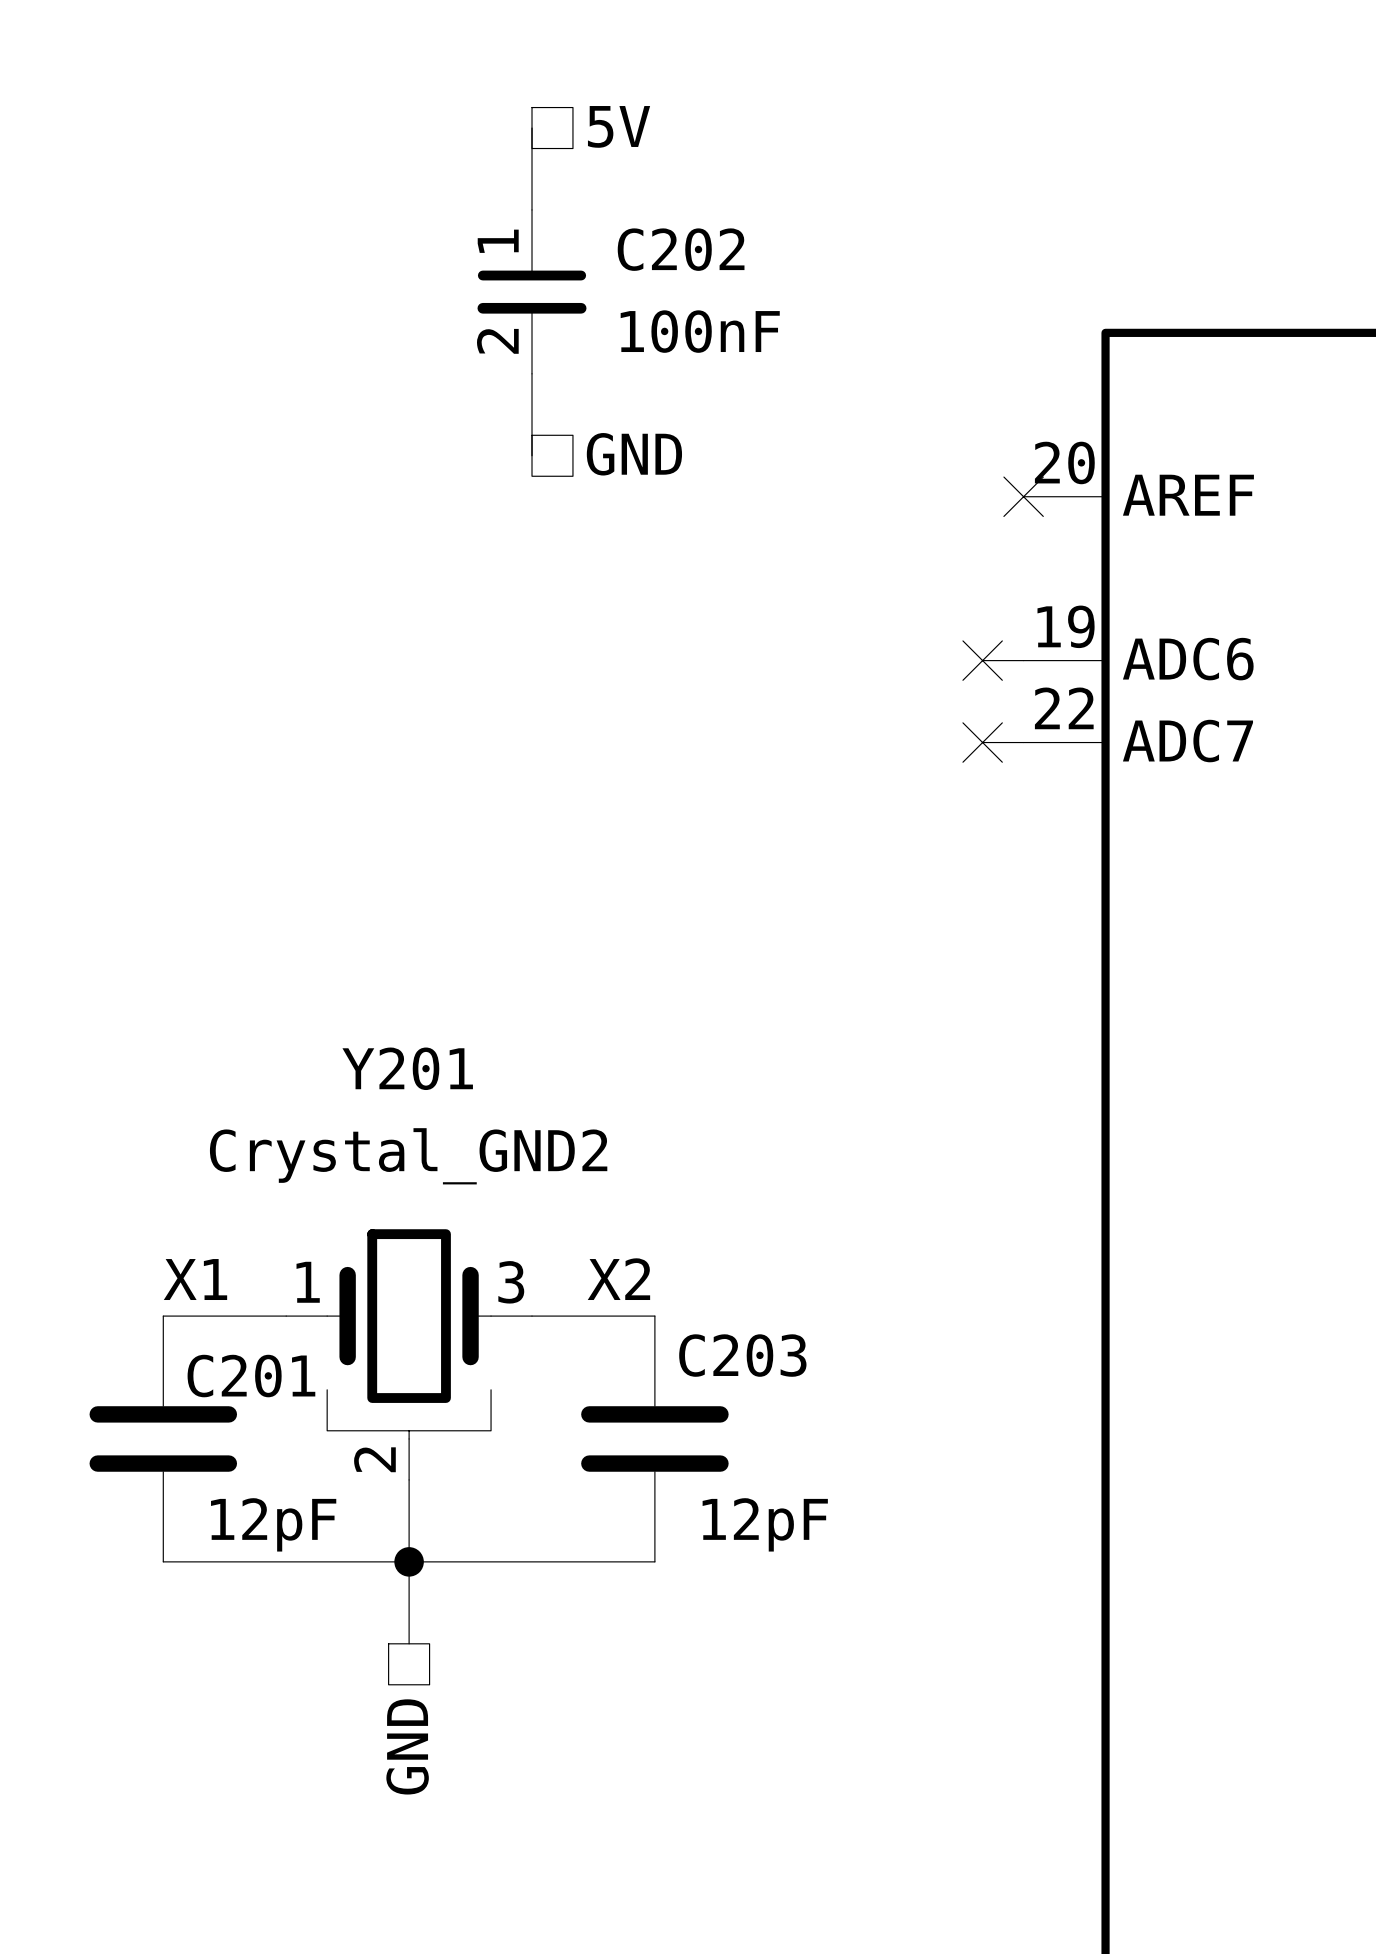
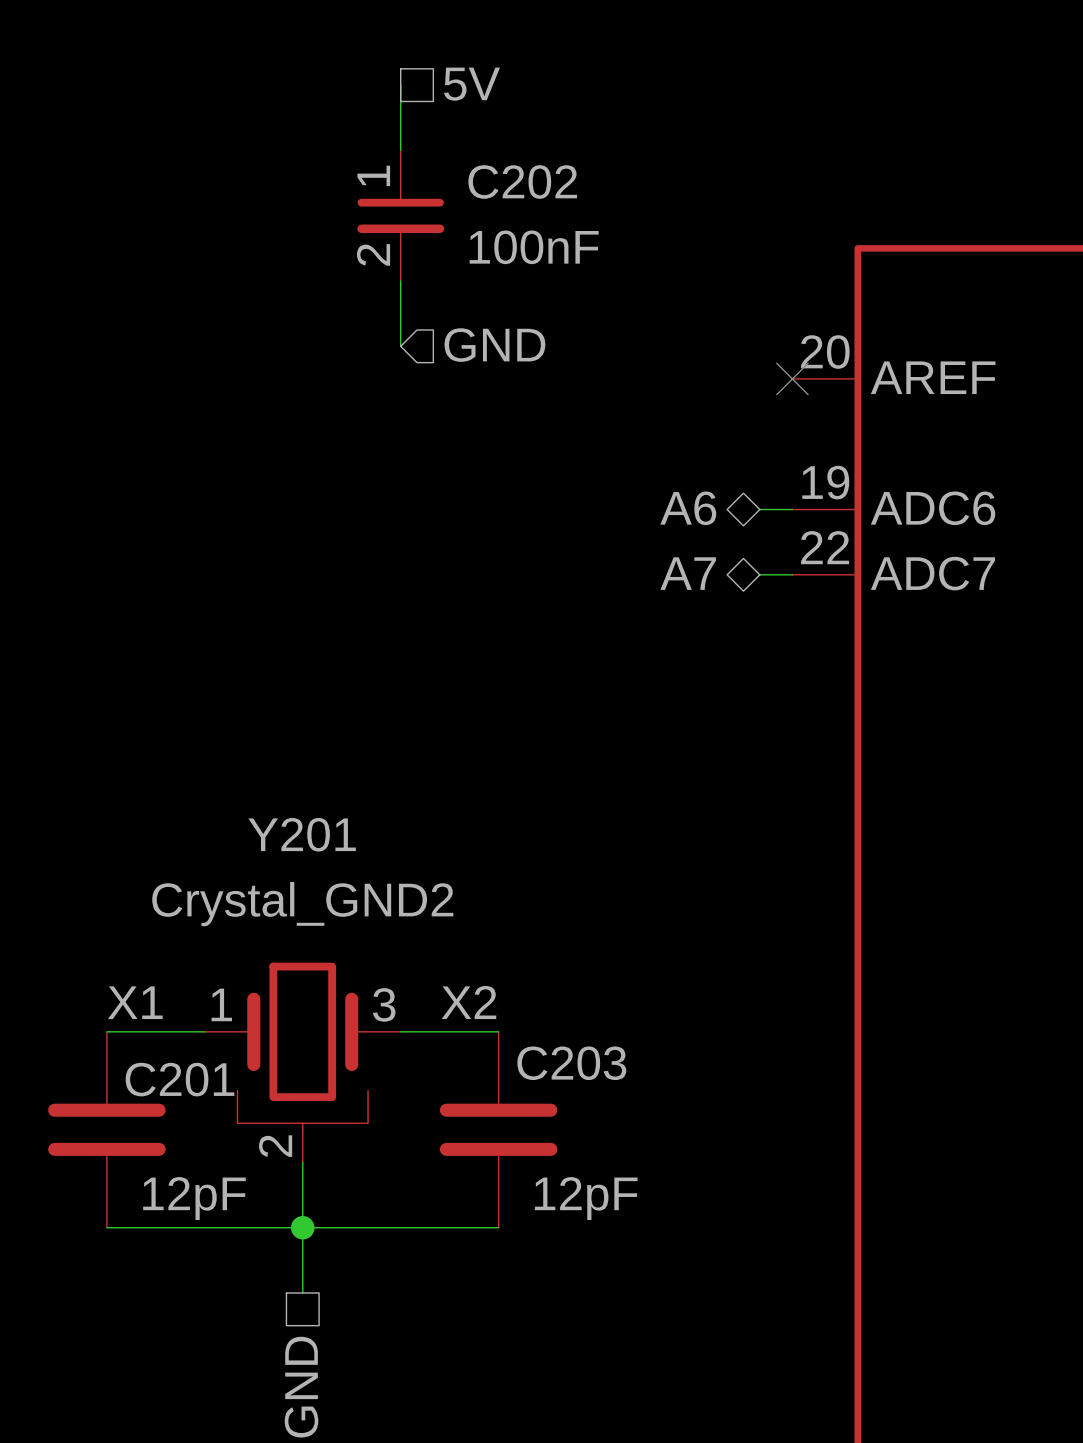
hierarchical label shape: passive (634, 454) -> input (494, 345)
hierarchical label: none -> A6 (688, 508)
no-connect mark: (982, 660) -> none
hierarchical label: none -> A7 (688, 573)
no-connect mark: (982, 742) -> none

